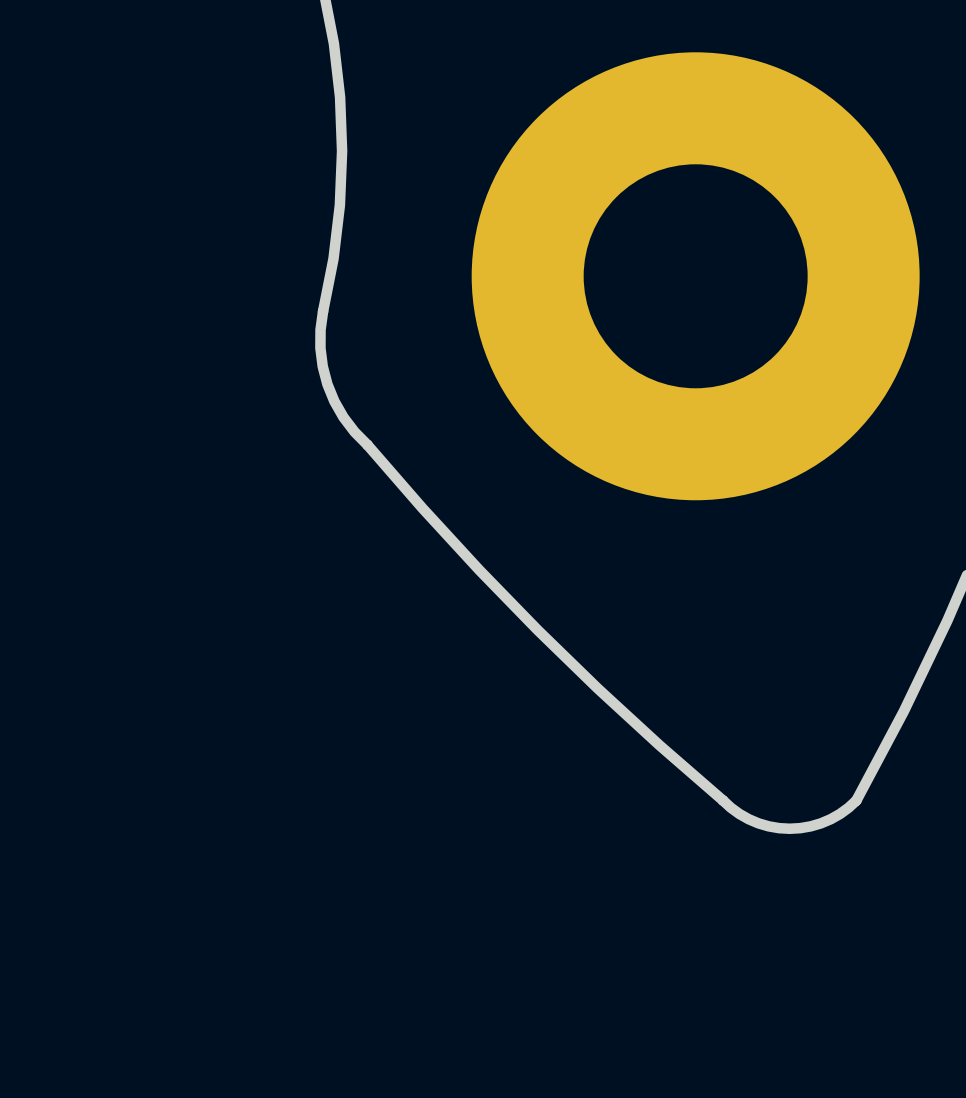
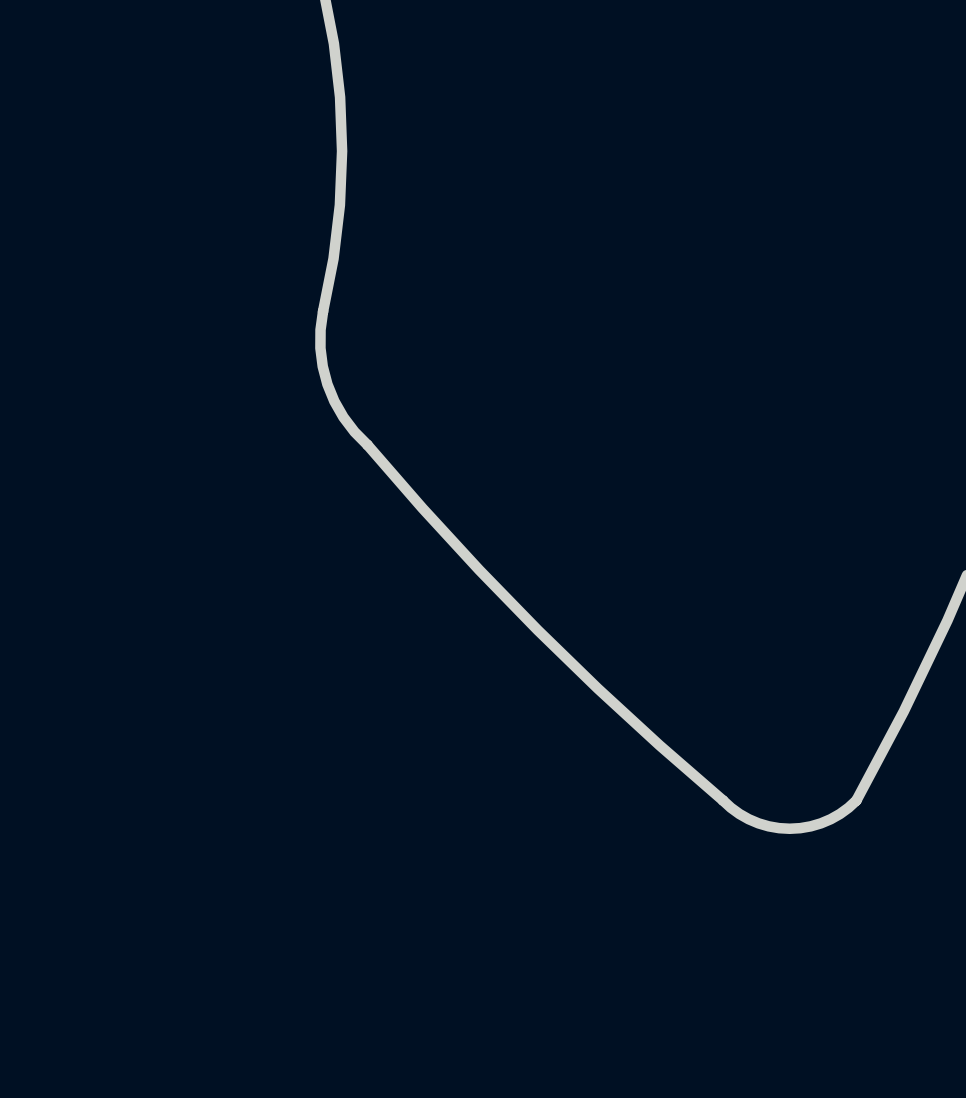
part: (695, 276) -> none

